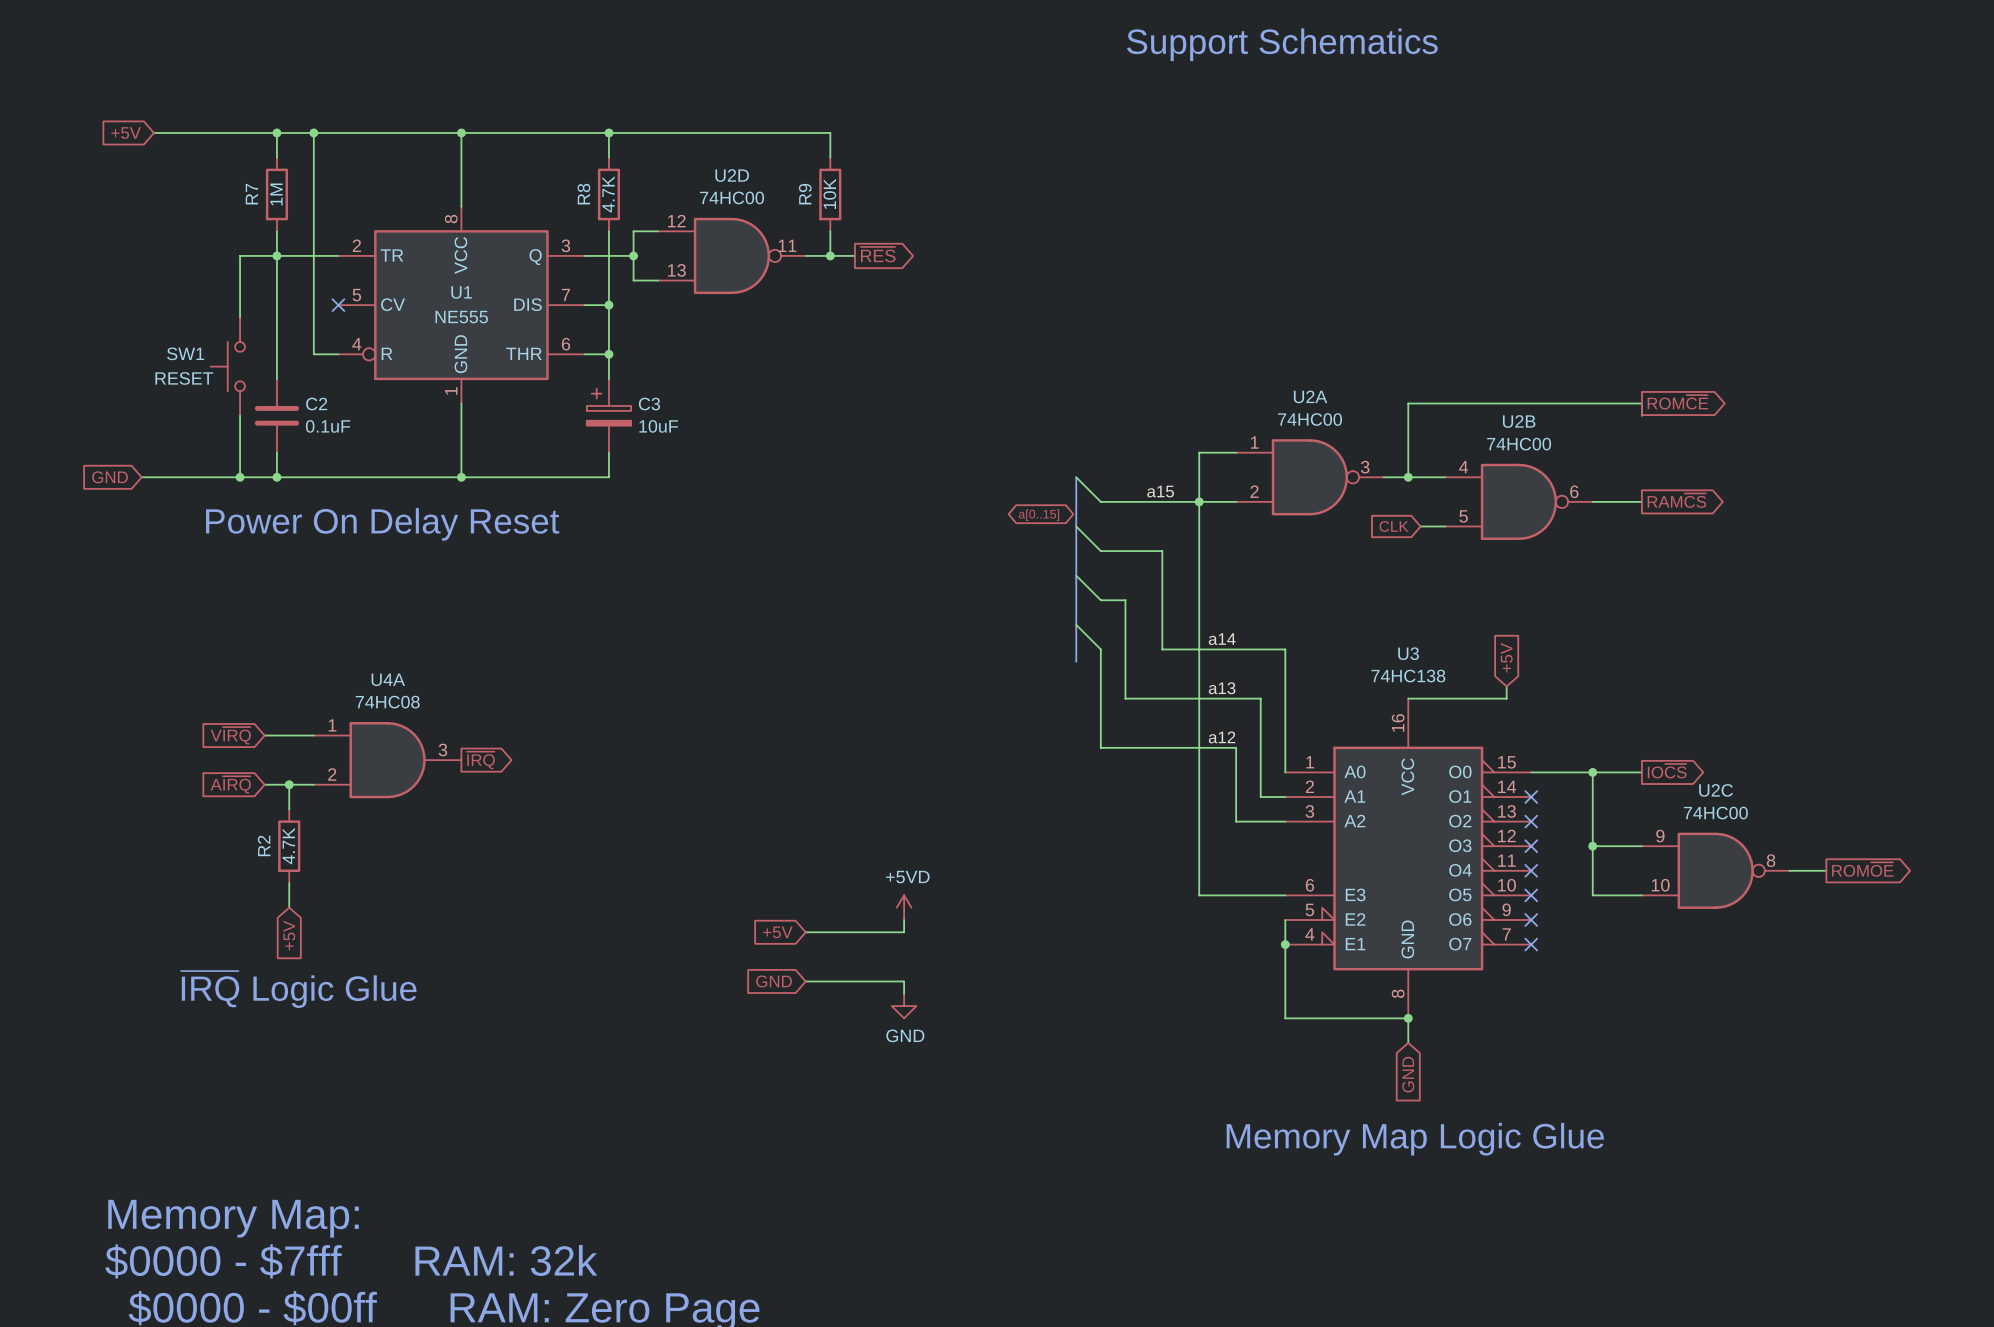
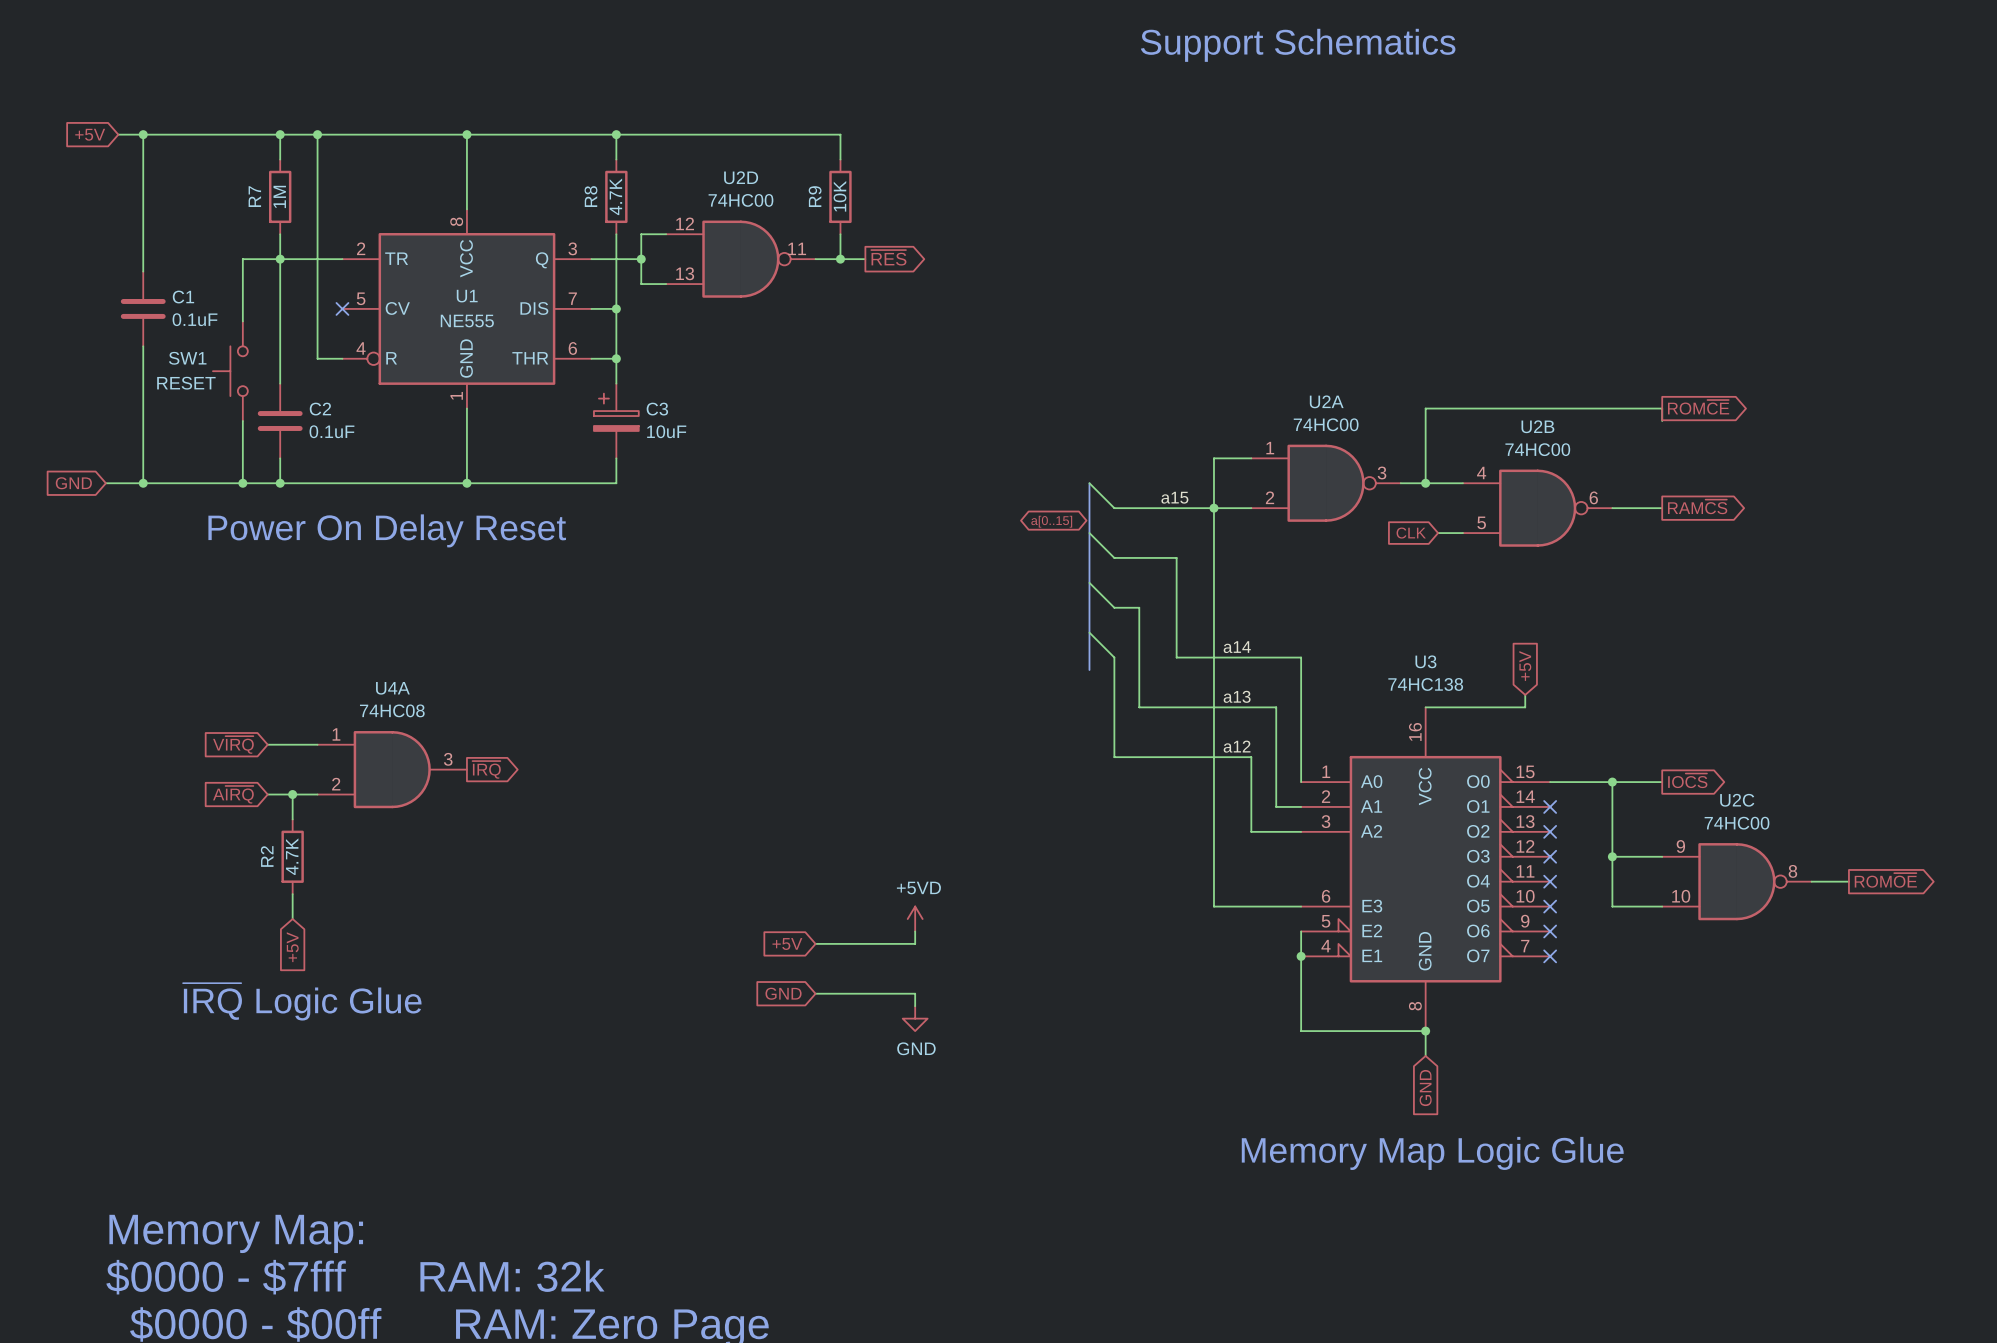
wire: none -> (118, 134) (155, 134)
wire: none -> (143, 134) (143, 271)
junction: none -> (143, 134)
global label position: +5V (126, 133) -> +5V (90, 134)
C1: none -> 0.1uF (143, 308)
wire: none -> (143, 346) (143, 483) (105, 483)
global label position: GND (110, 477) -> GND (73, 483)
junction: none -> (143, 483)

